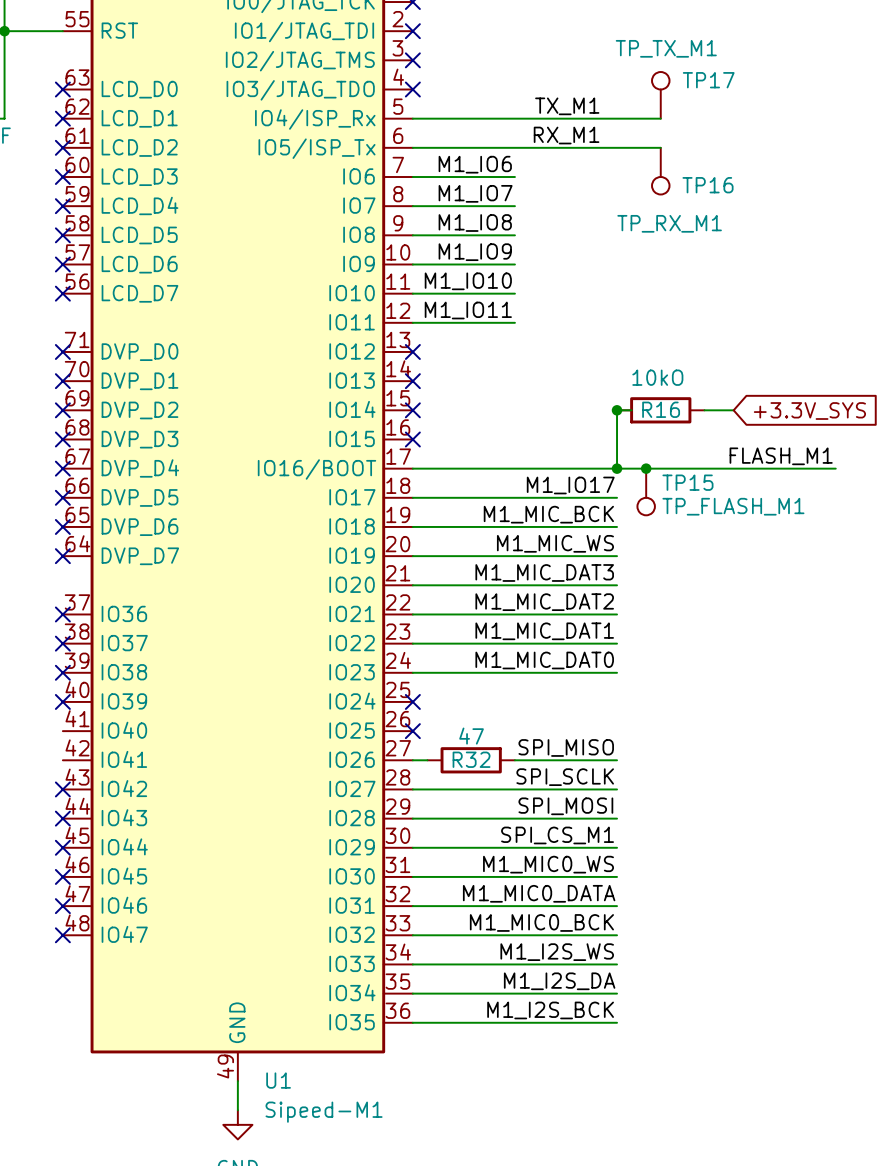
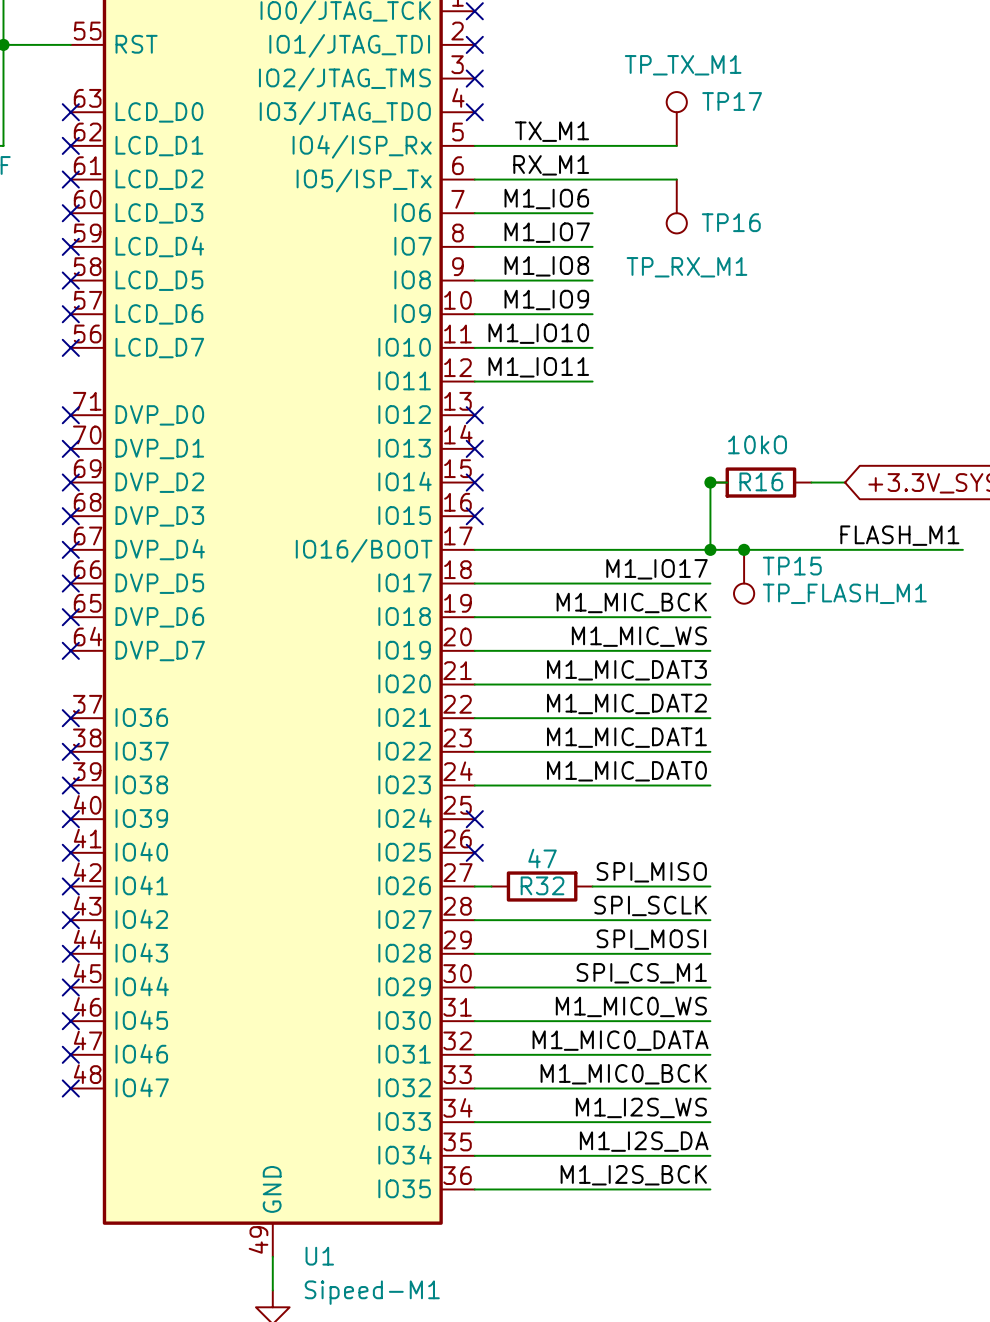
TP17 position: (660, 95) -> (676, 118)
label position: TX_M1 (567, 106) -> TX_M1 (552, 131)
wire: (587, 118) (660, 118) -> none
label position: RX_M1 (566, 135) -> RX_M1 (551, 165)
wire: (587, 147) (660, 147) -> none
TP16 position: (660, 171) -> (676, 206)
no-connect mark: none -> (70, 852)
no-connect mark: none -> (70, 886)

